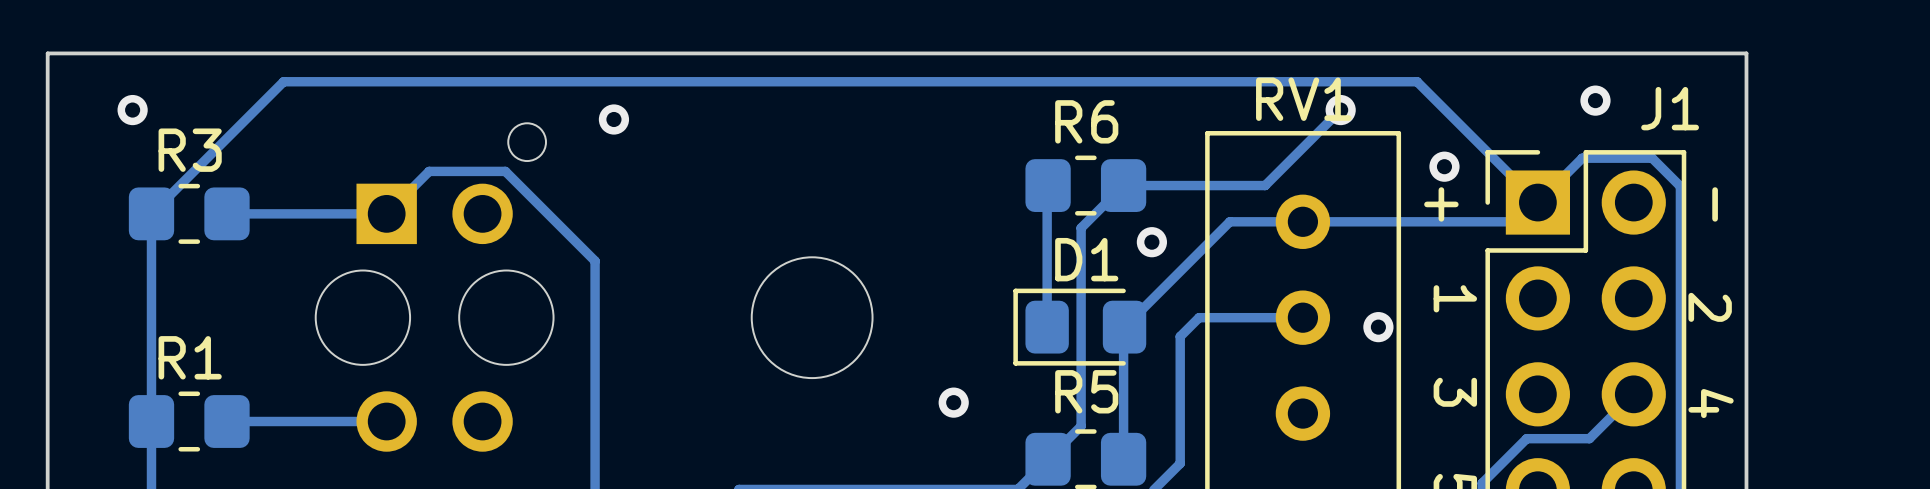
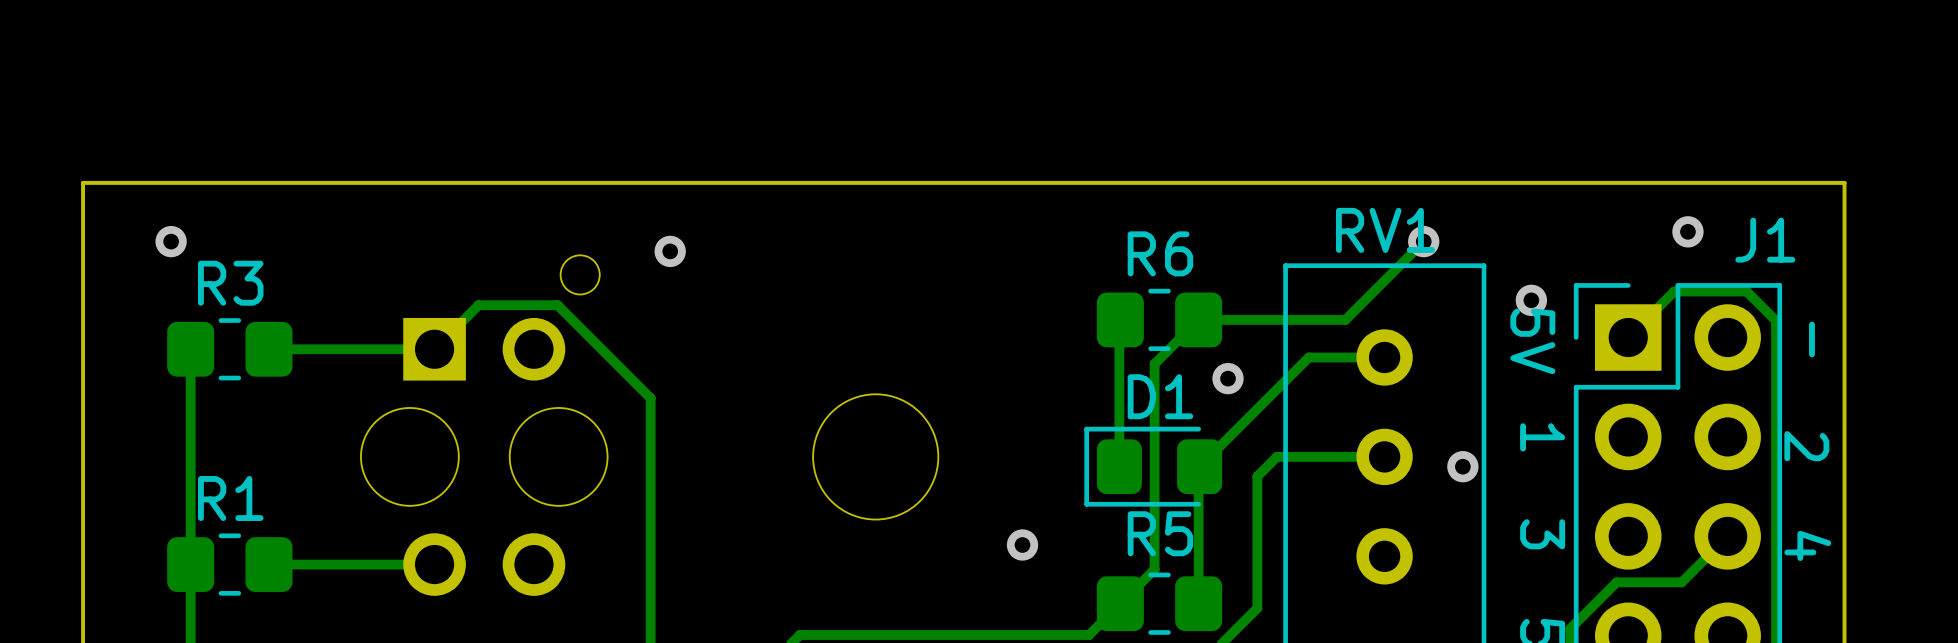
track: (1537, 202) (1417, 81) (283, 81) (151, 213) -> none
text: + (1441, 204) -> 5V (1532, 341)
track: (1518, 221) (1302, 221) -> none

